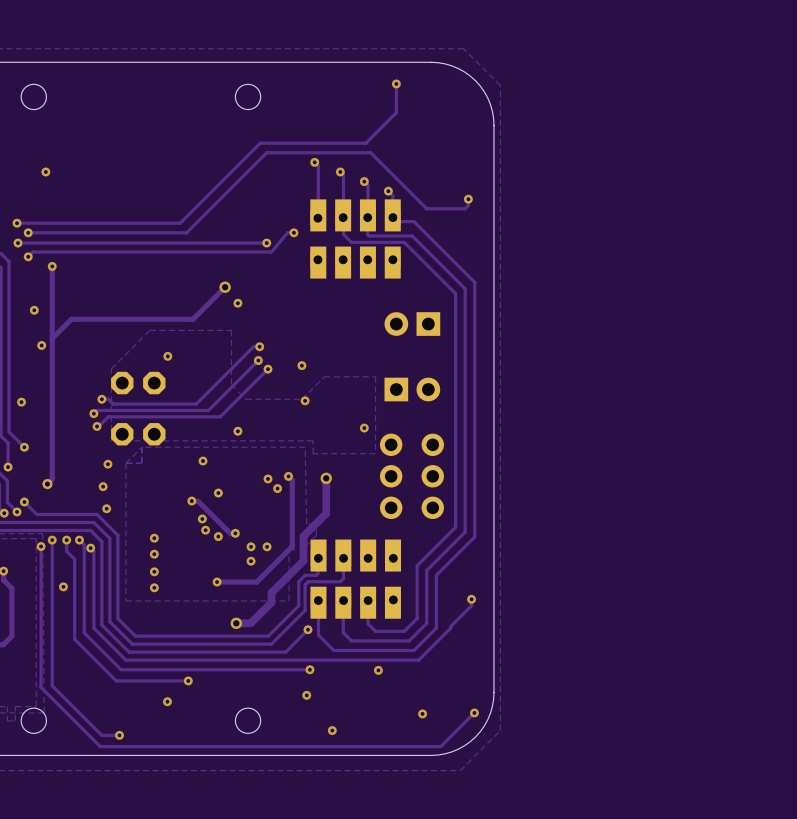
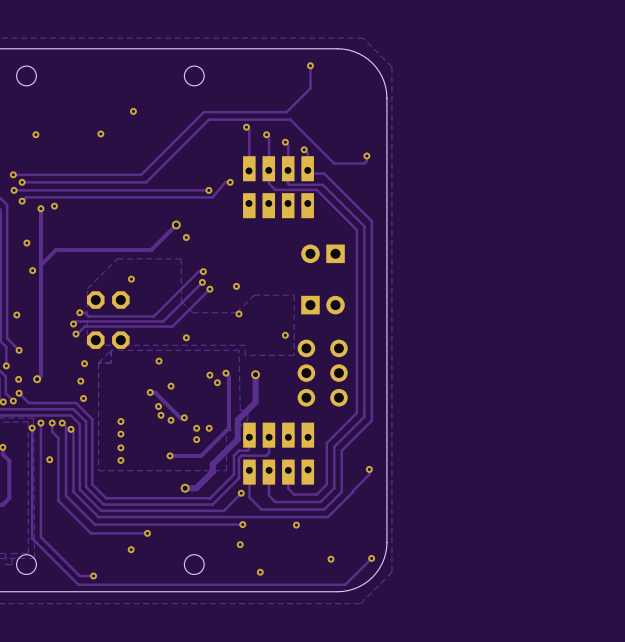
via: none -> (133, 111)
via: none -> (100, 133)
via: none -> (54, 206)
via: none -> (18, 379)

